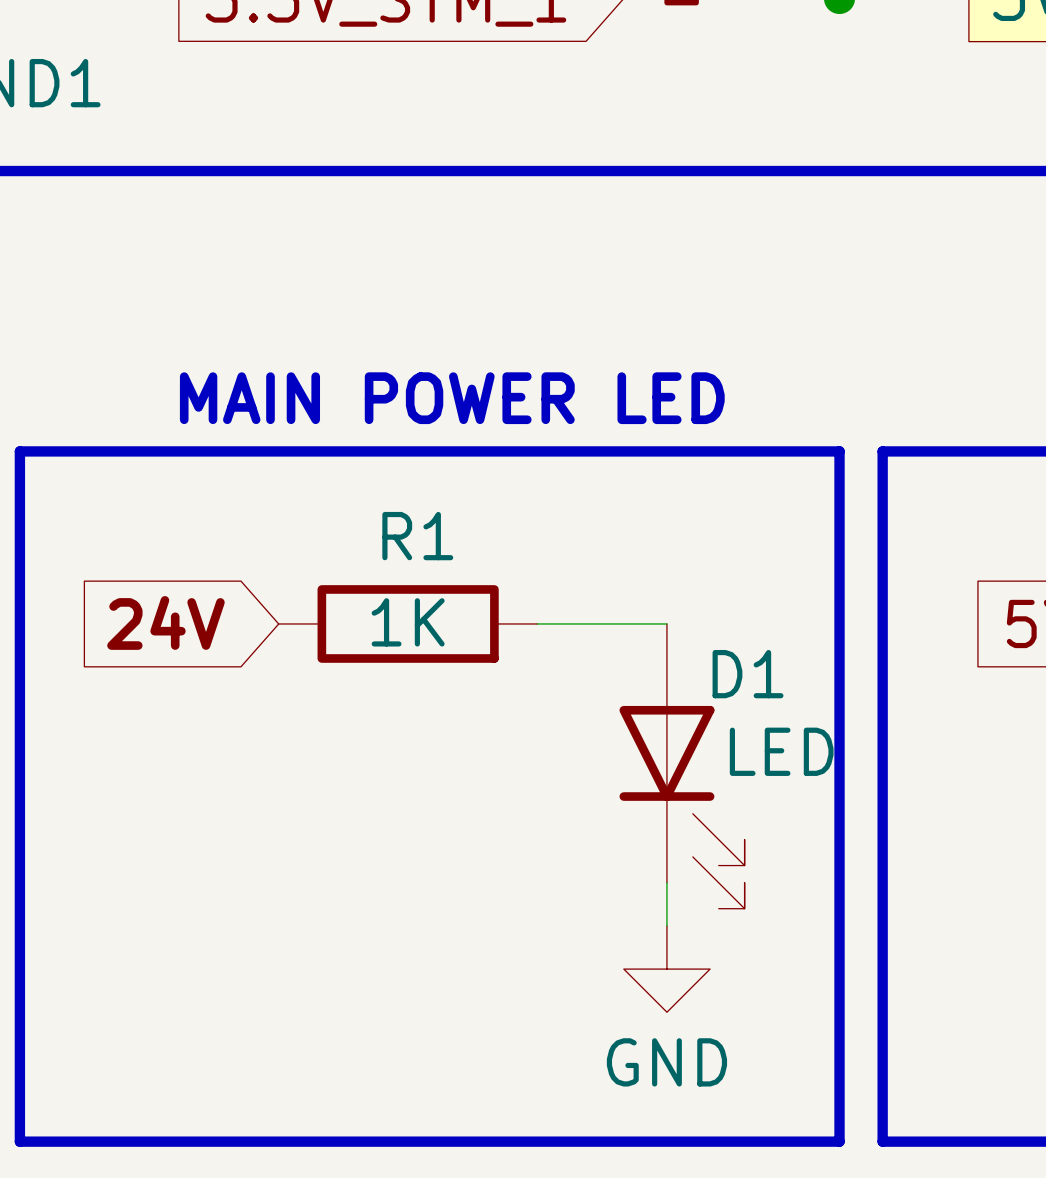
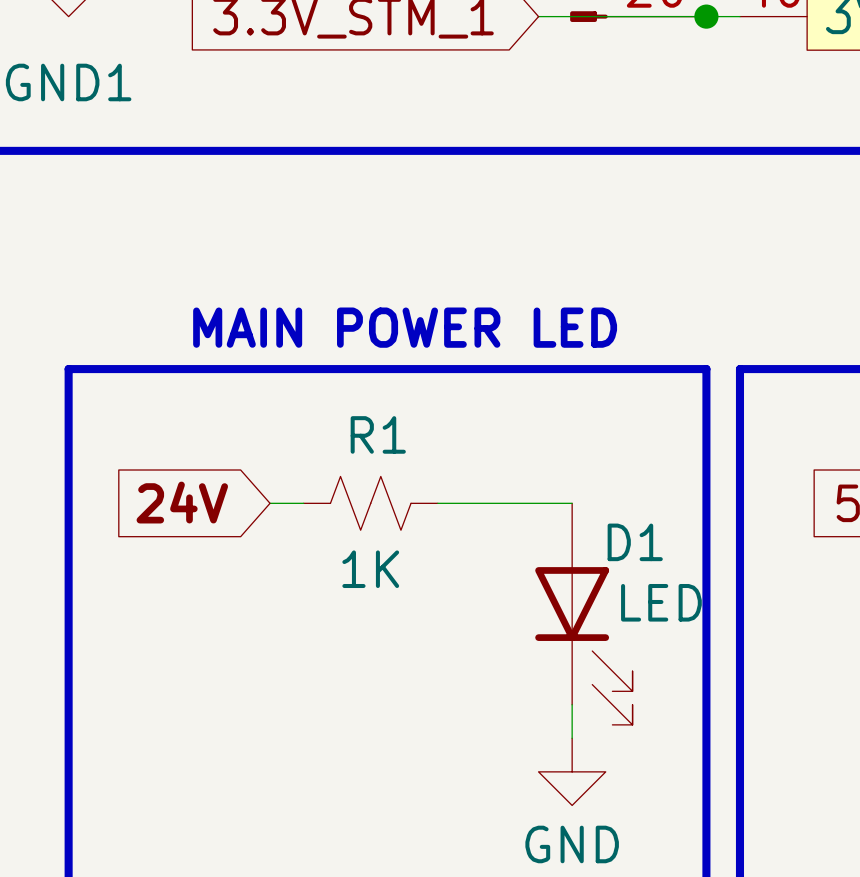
R1 symbol: [278, 585, 538, 663] -> [303, 476, 438, 531]
R1 value position: 1K (408, 622) -> 1K (370, 569)

